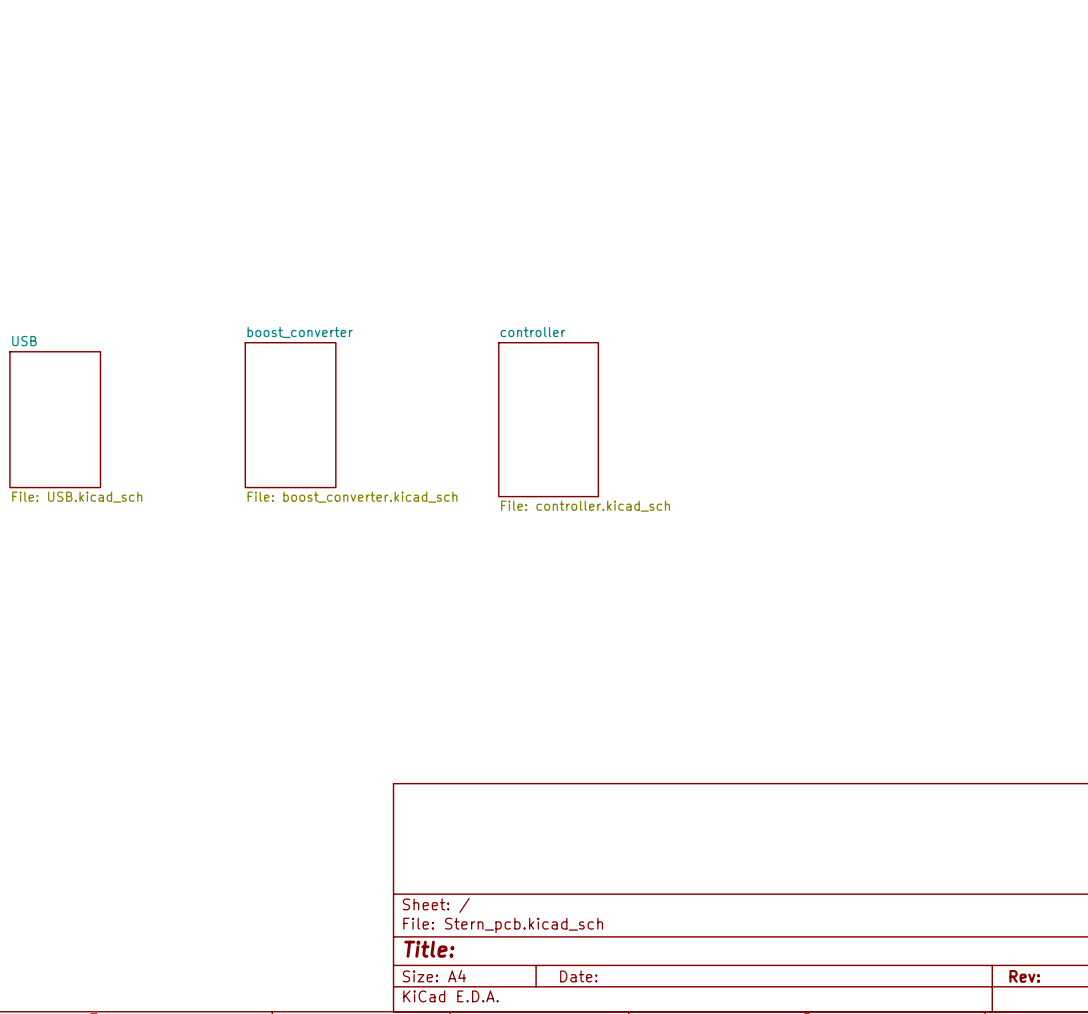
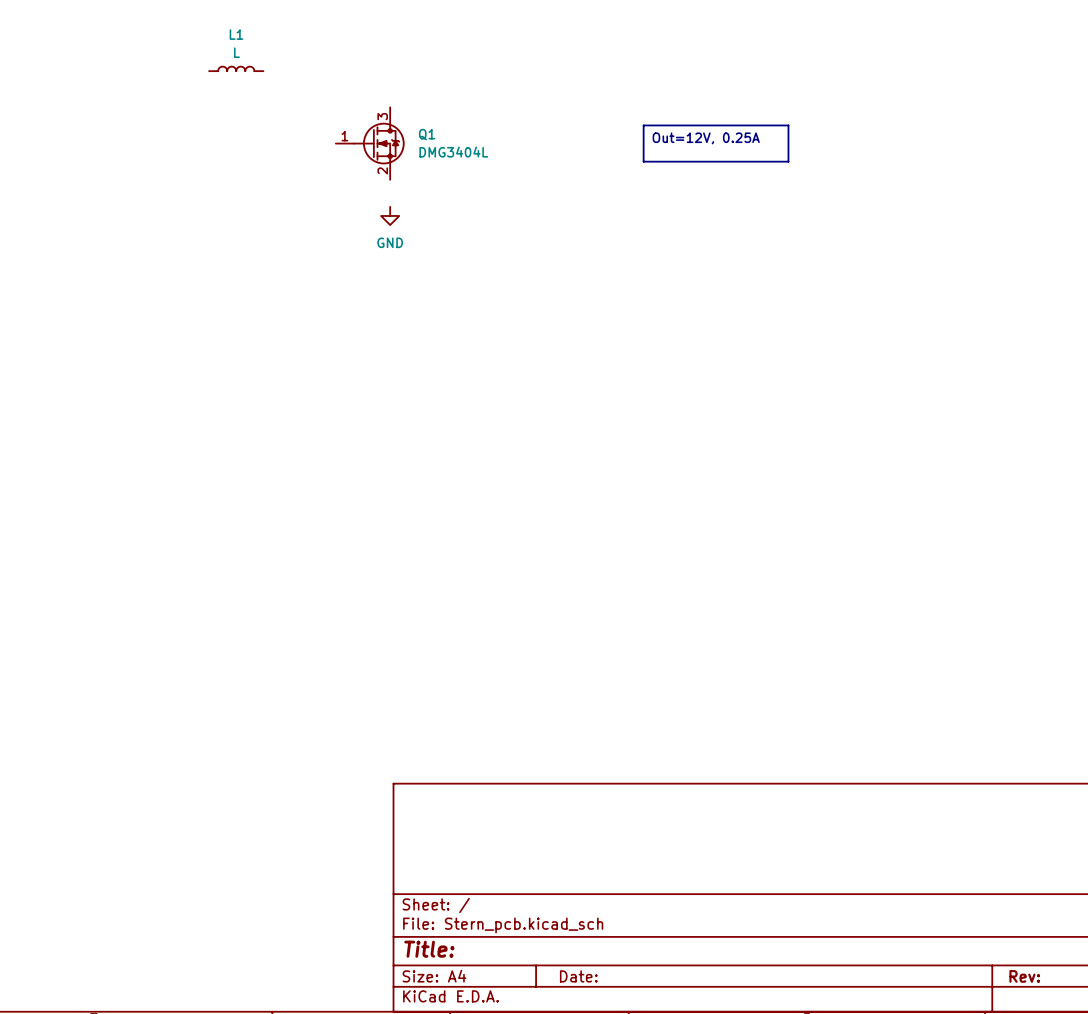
L1: none -> L (236, 68)
line: none -> (643, 125) (788, 125) (788, 161) (643, 161) (643, 125)
text: none -> Out=12V, 0.25A (706, 138)
Q1: none -> DMG3404L (370, 143)
power symbol: none -> GND (390, 215)
sheet boost_converter: File: boost_converter.kicad_sch (290, 415) -> none
sheet USB: File: USB.kicad_sch (55, 419) -> none
sheet controller: File: controller.kicad_sch (548, 419) -> none

